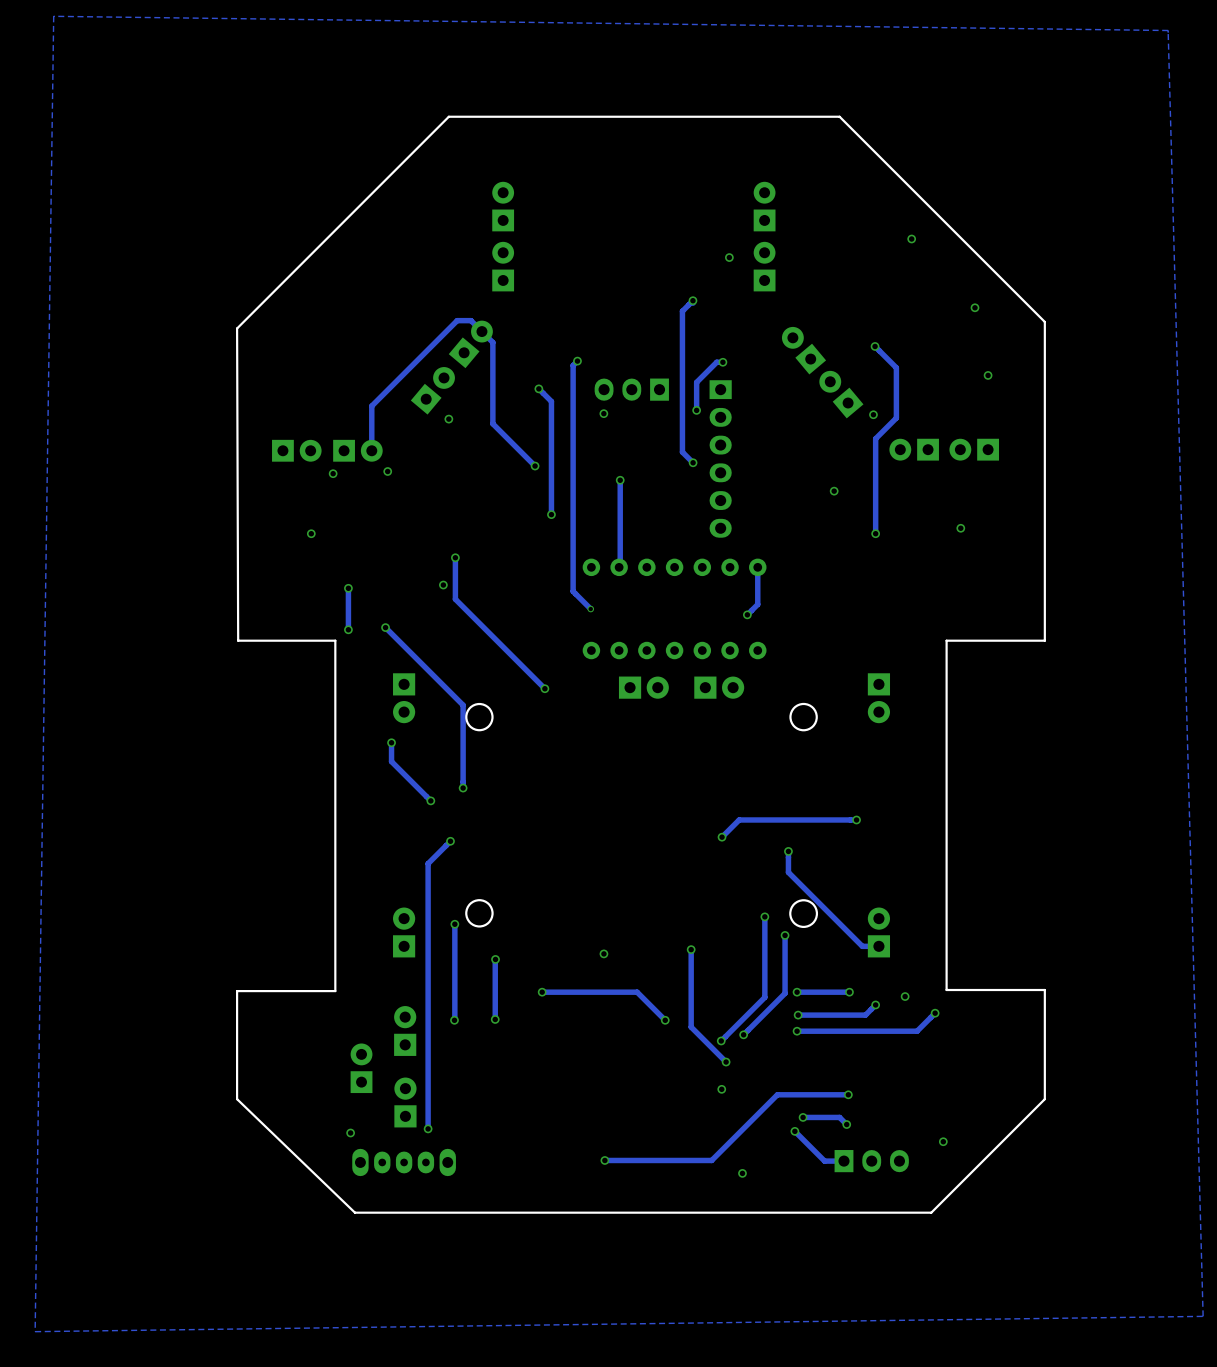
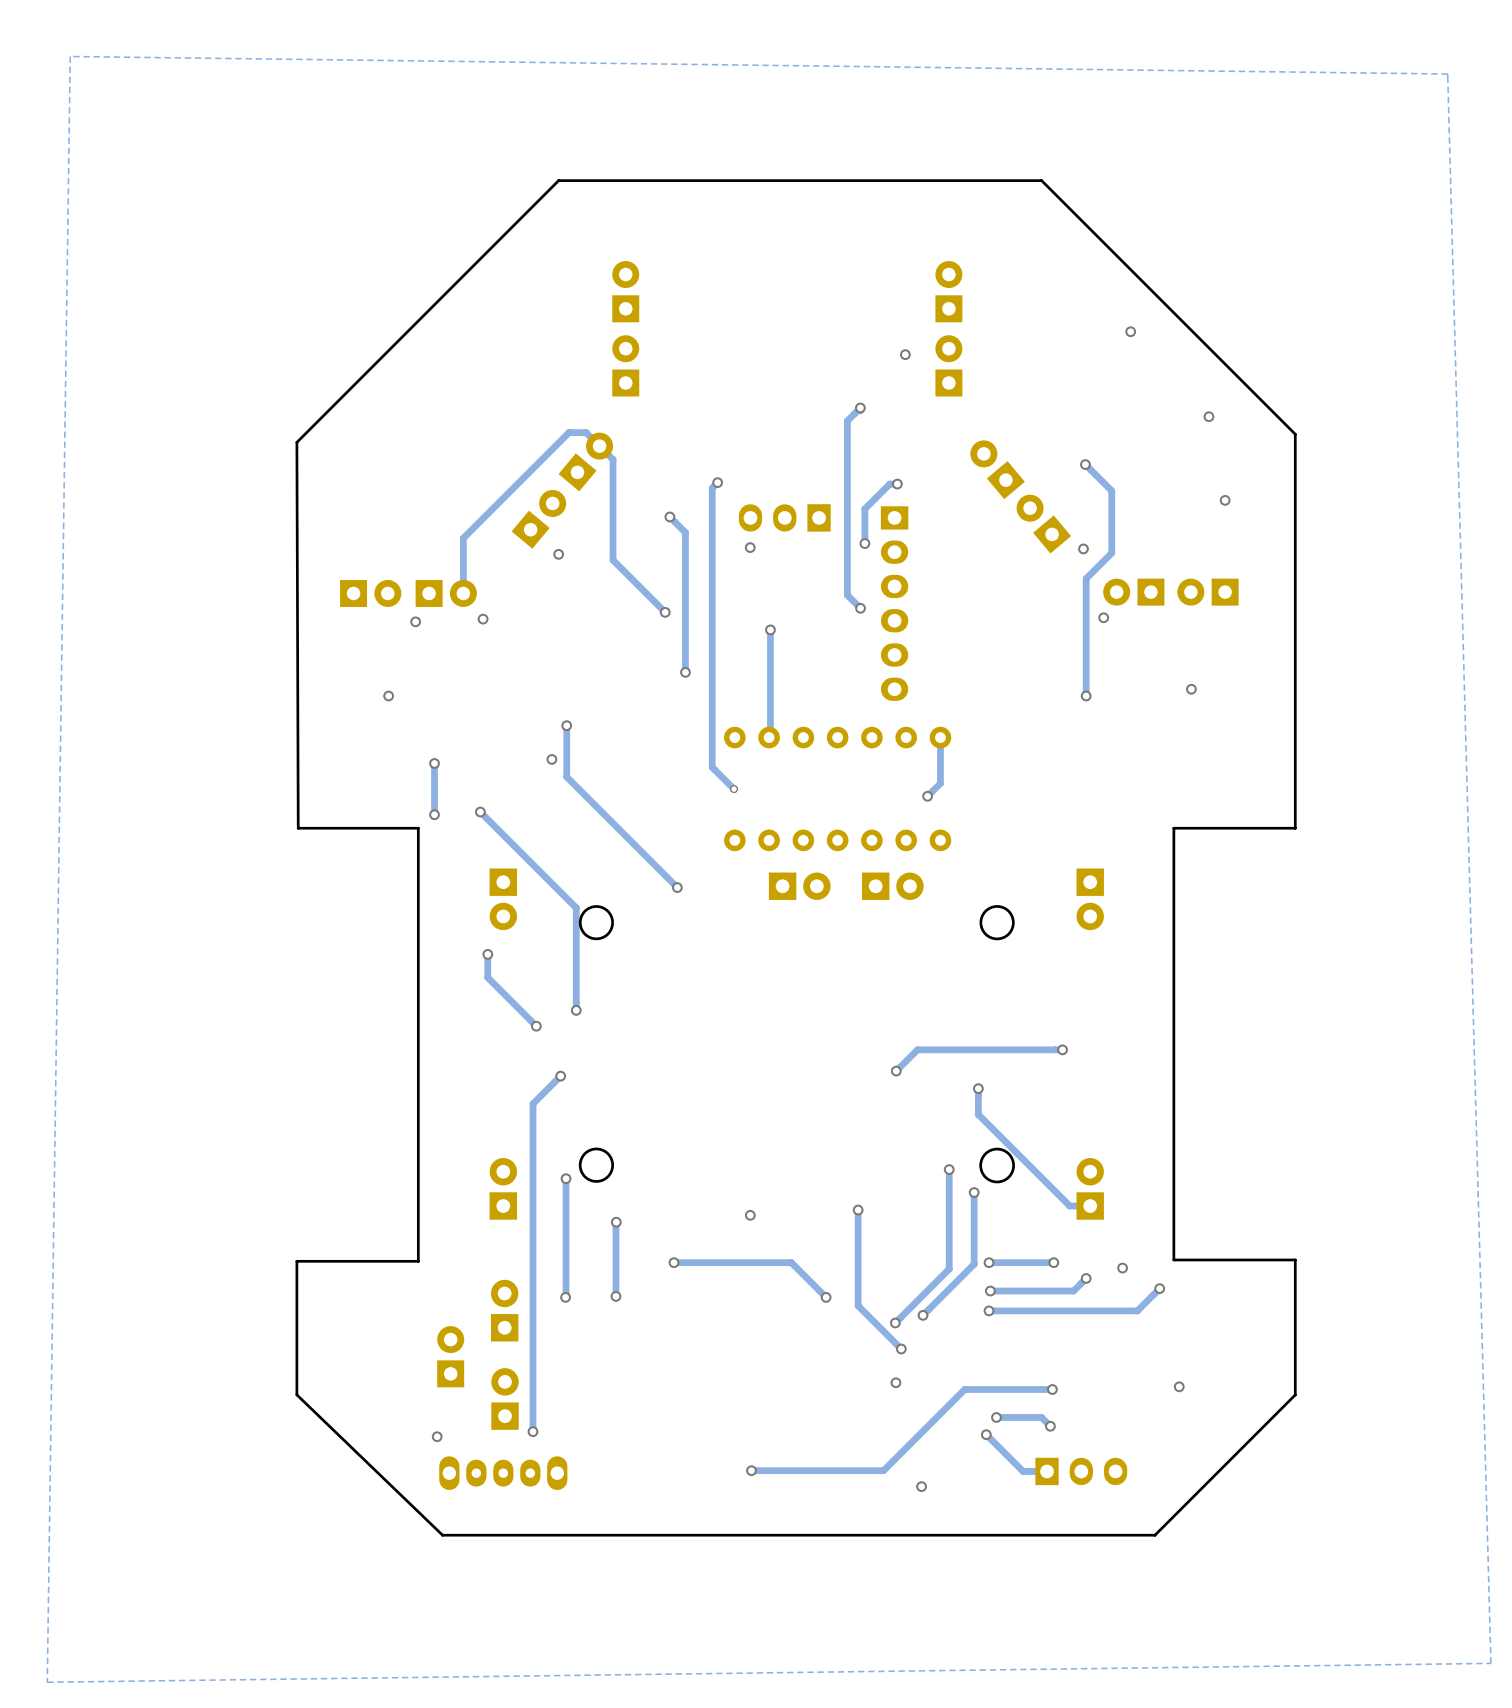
via position: (834, 491) -> (1103, 617)
via position: (943, 1141) -> (1179, 1386)

